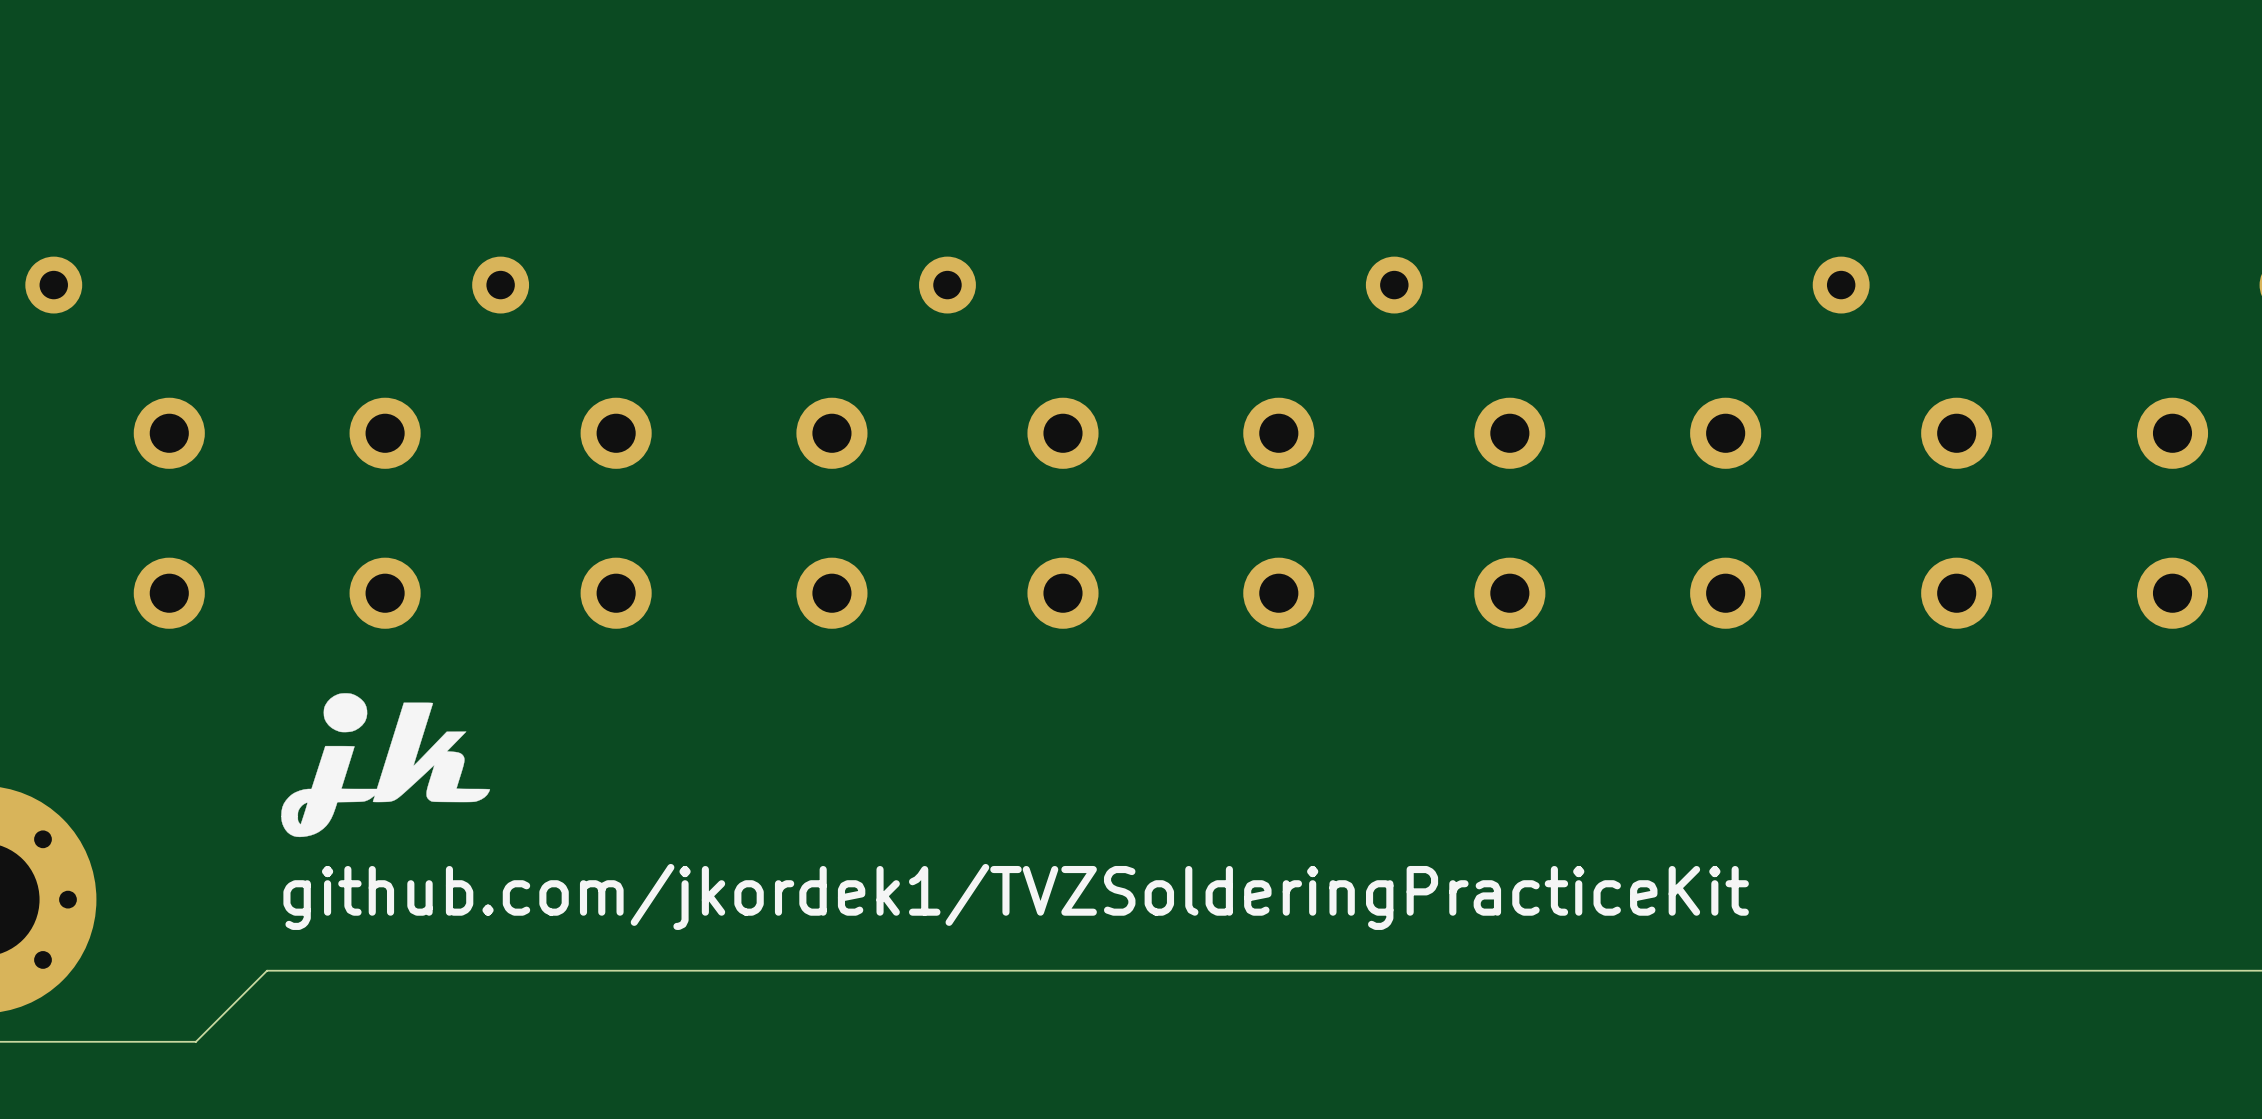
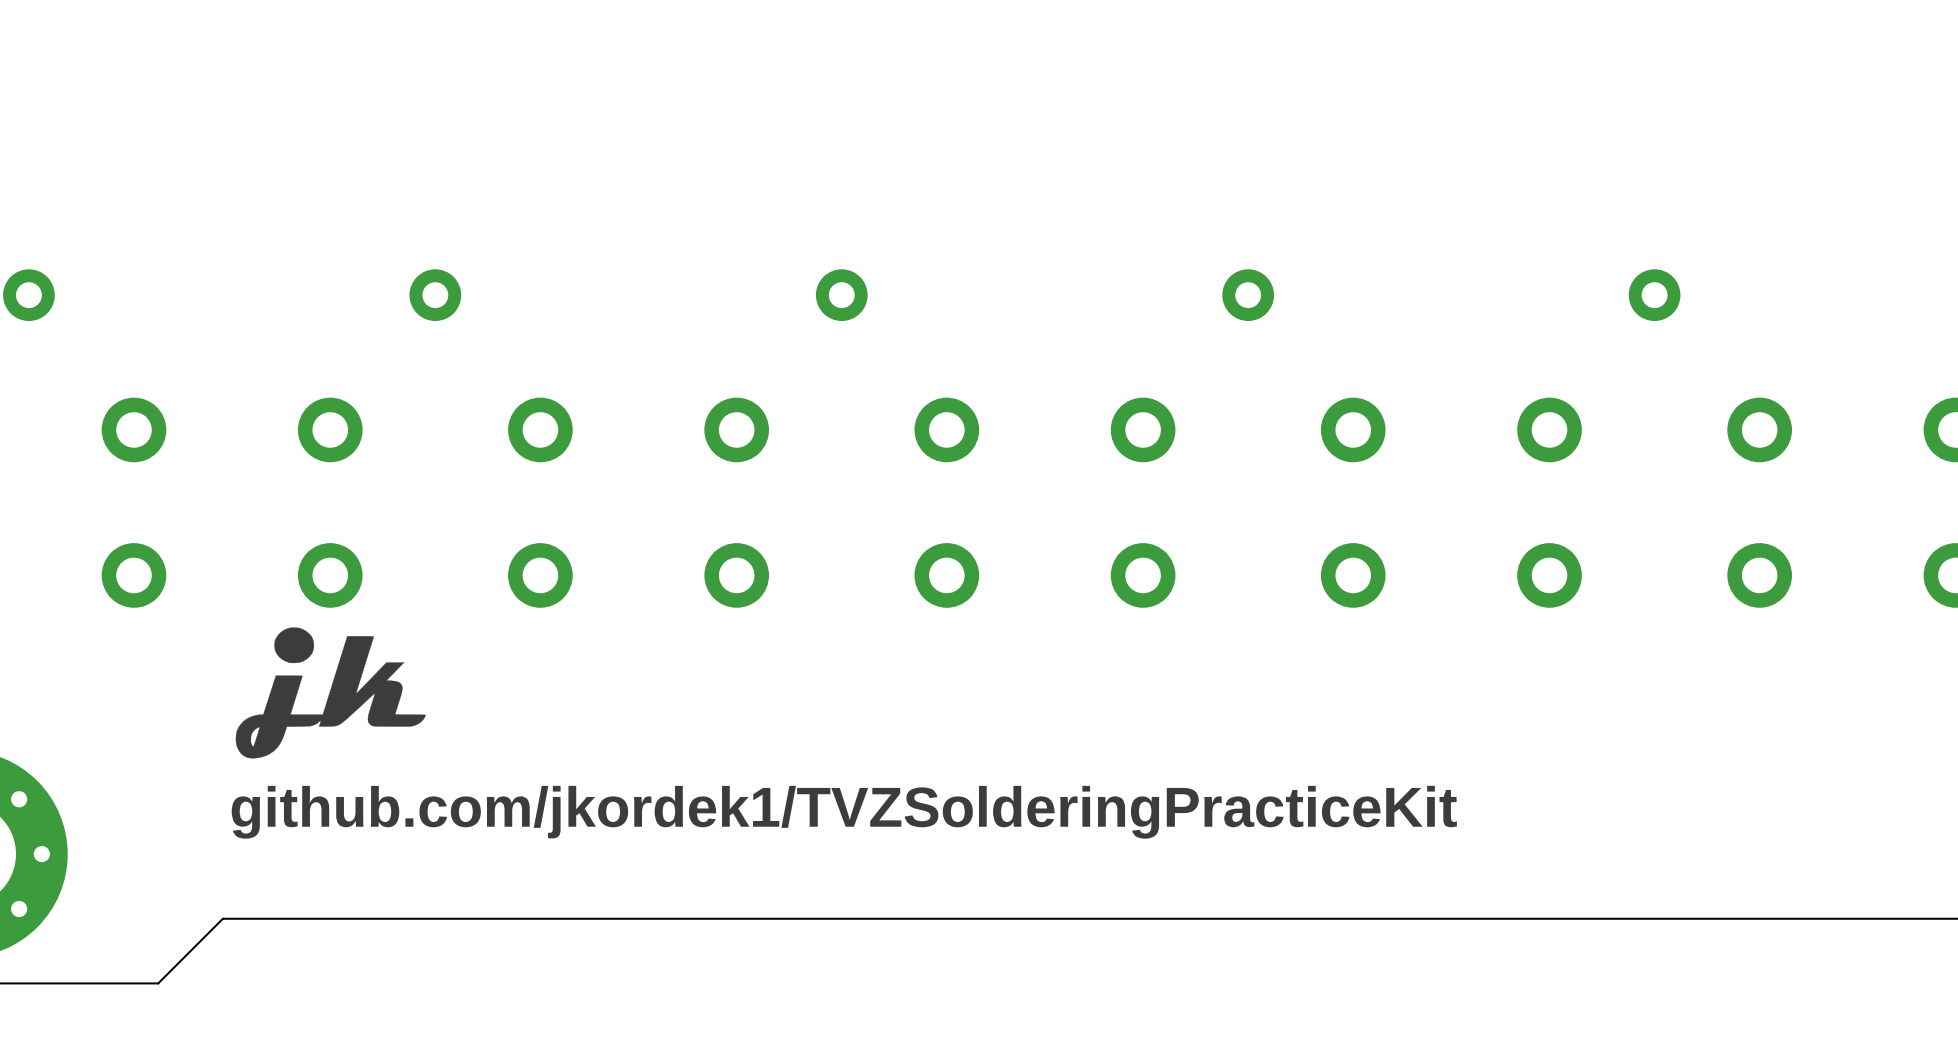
drawing position: (385, 765) -> (330, 692)
text position: github.com/jkordek1/TVZSolderingPracticeKit (1016, 896) -> github.com/jkordek1/TVZSolderingPracticeKit (844, 812)

